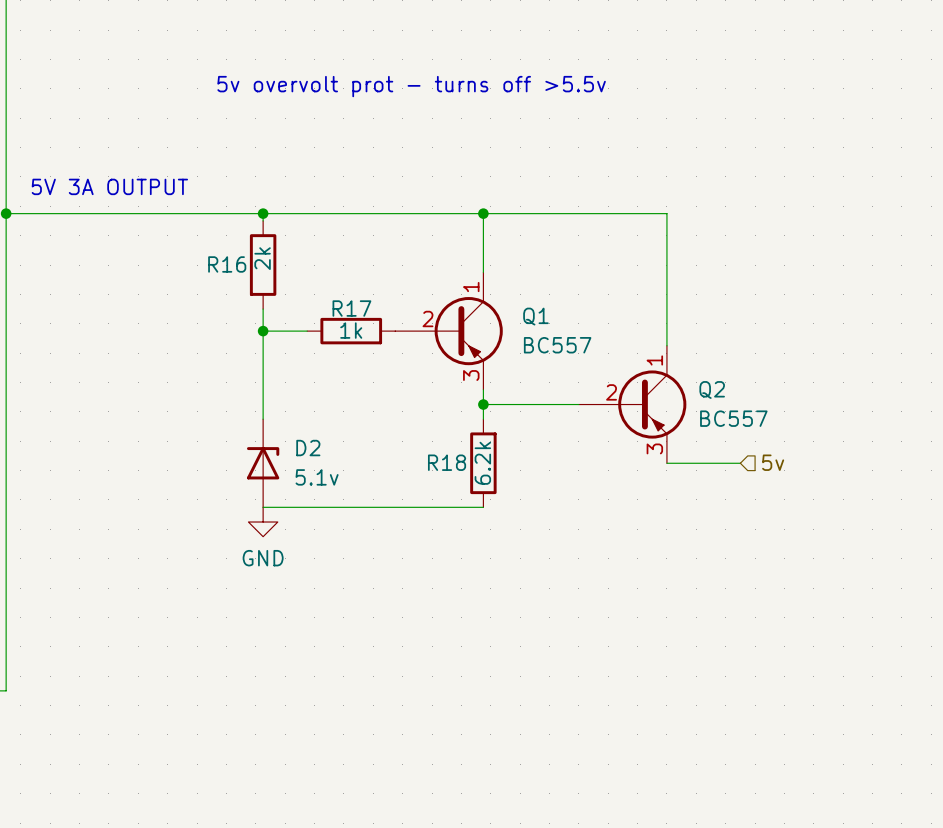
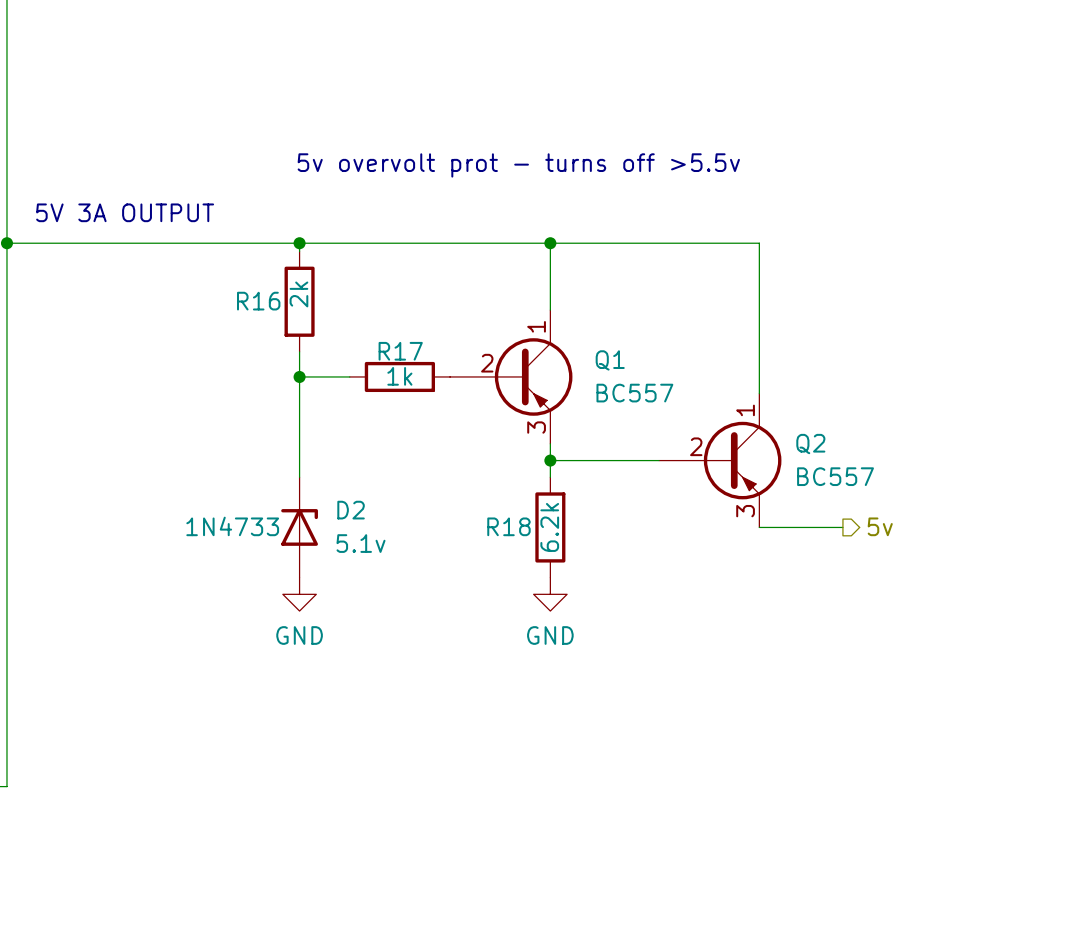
text position: 5v overvolt prot - turns off >5.5v (411, 86) -> 5v overvolt prot - turns off >5.5v (518, 165)
D2 text: none -> 1N4733 (232, 526)
hierarchical label shape: input (773, 462) -> output (880, 526)
wire: (263, 507) (483, 507) -> none
power symbol: none -> GND (550, 594)

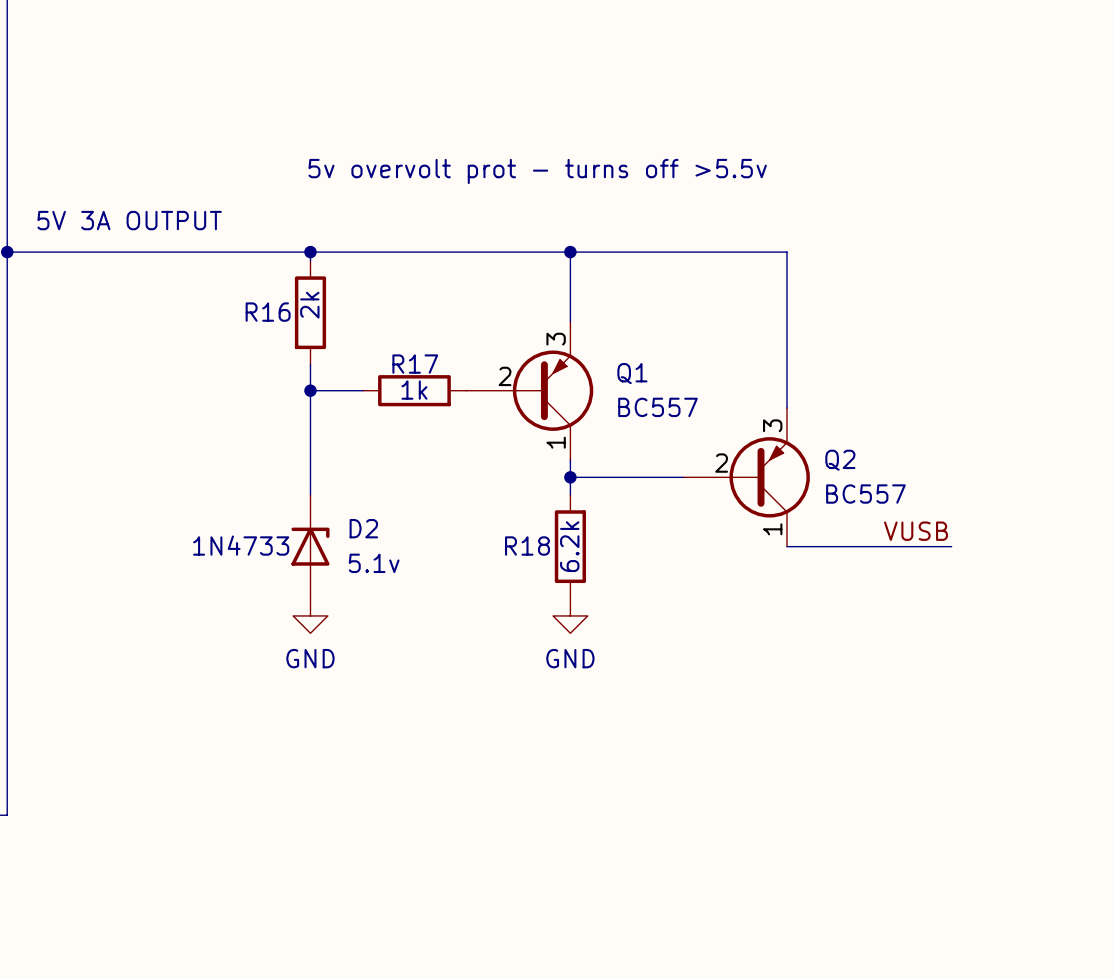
Q1 flip: as is (533, 376) -> up-down (553, 390)
Q2 flip: as is (742, 460) -> up-down (769, 477)
label: none -> VUSB (916, 531)
hierarchical label: 5v (880, 526) -> none
wire: none -> (873, 546) (951, 546)

